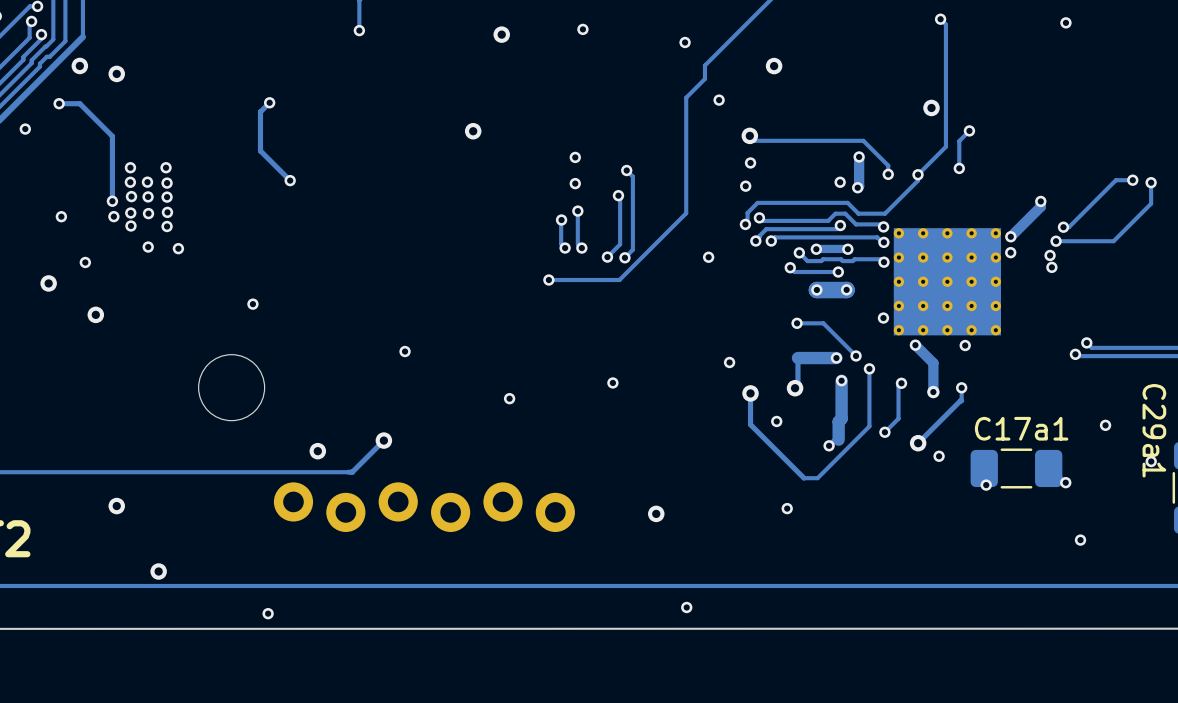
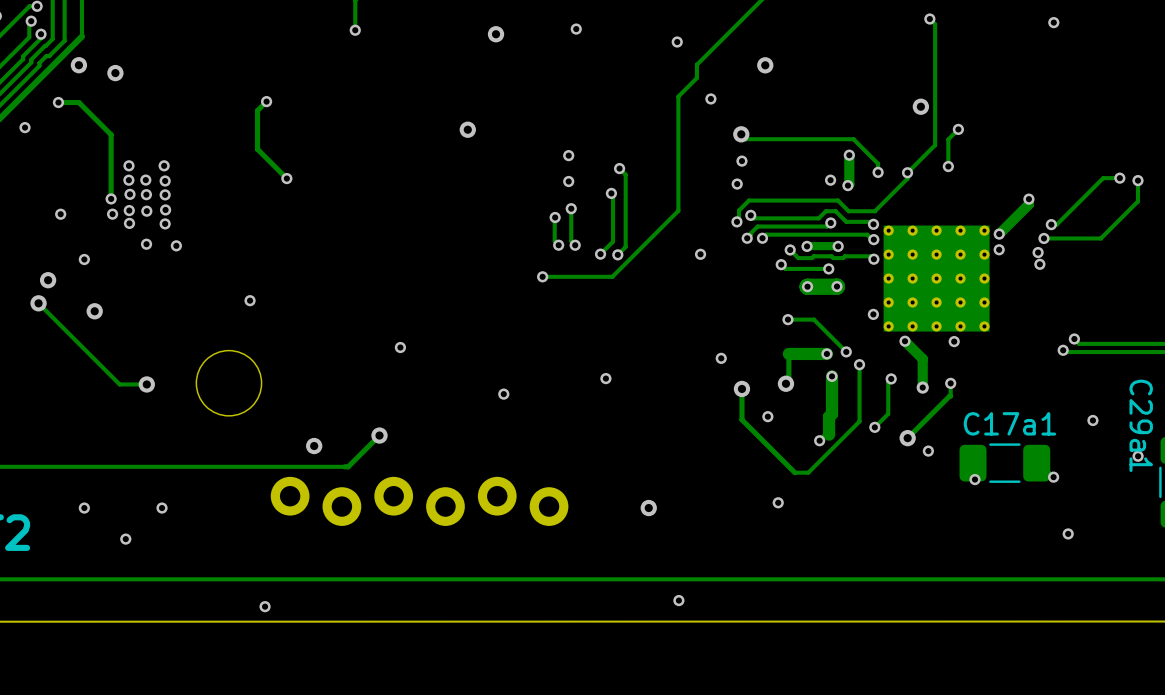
track: none -> (38, 303) (119, 384) (146, 384)
via: none -> (38, 303)
via: none -> (146, 384)
via: (116, 506) -> none
via: none -> (84, 508)
via: none -> (162, 508)
via: none -> (125, 539)
via: (158, 571) -> none

